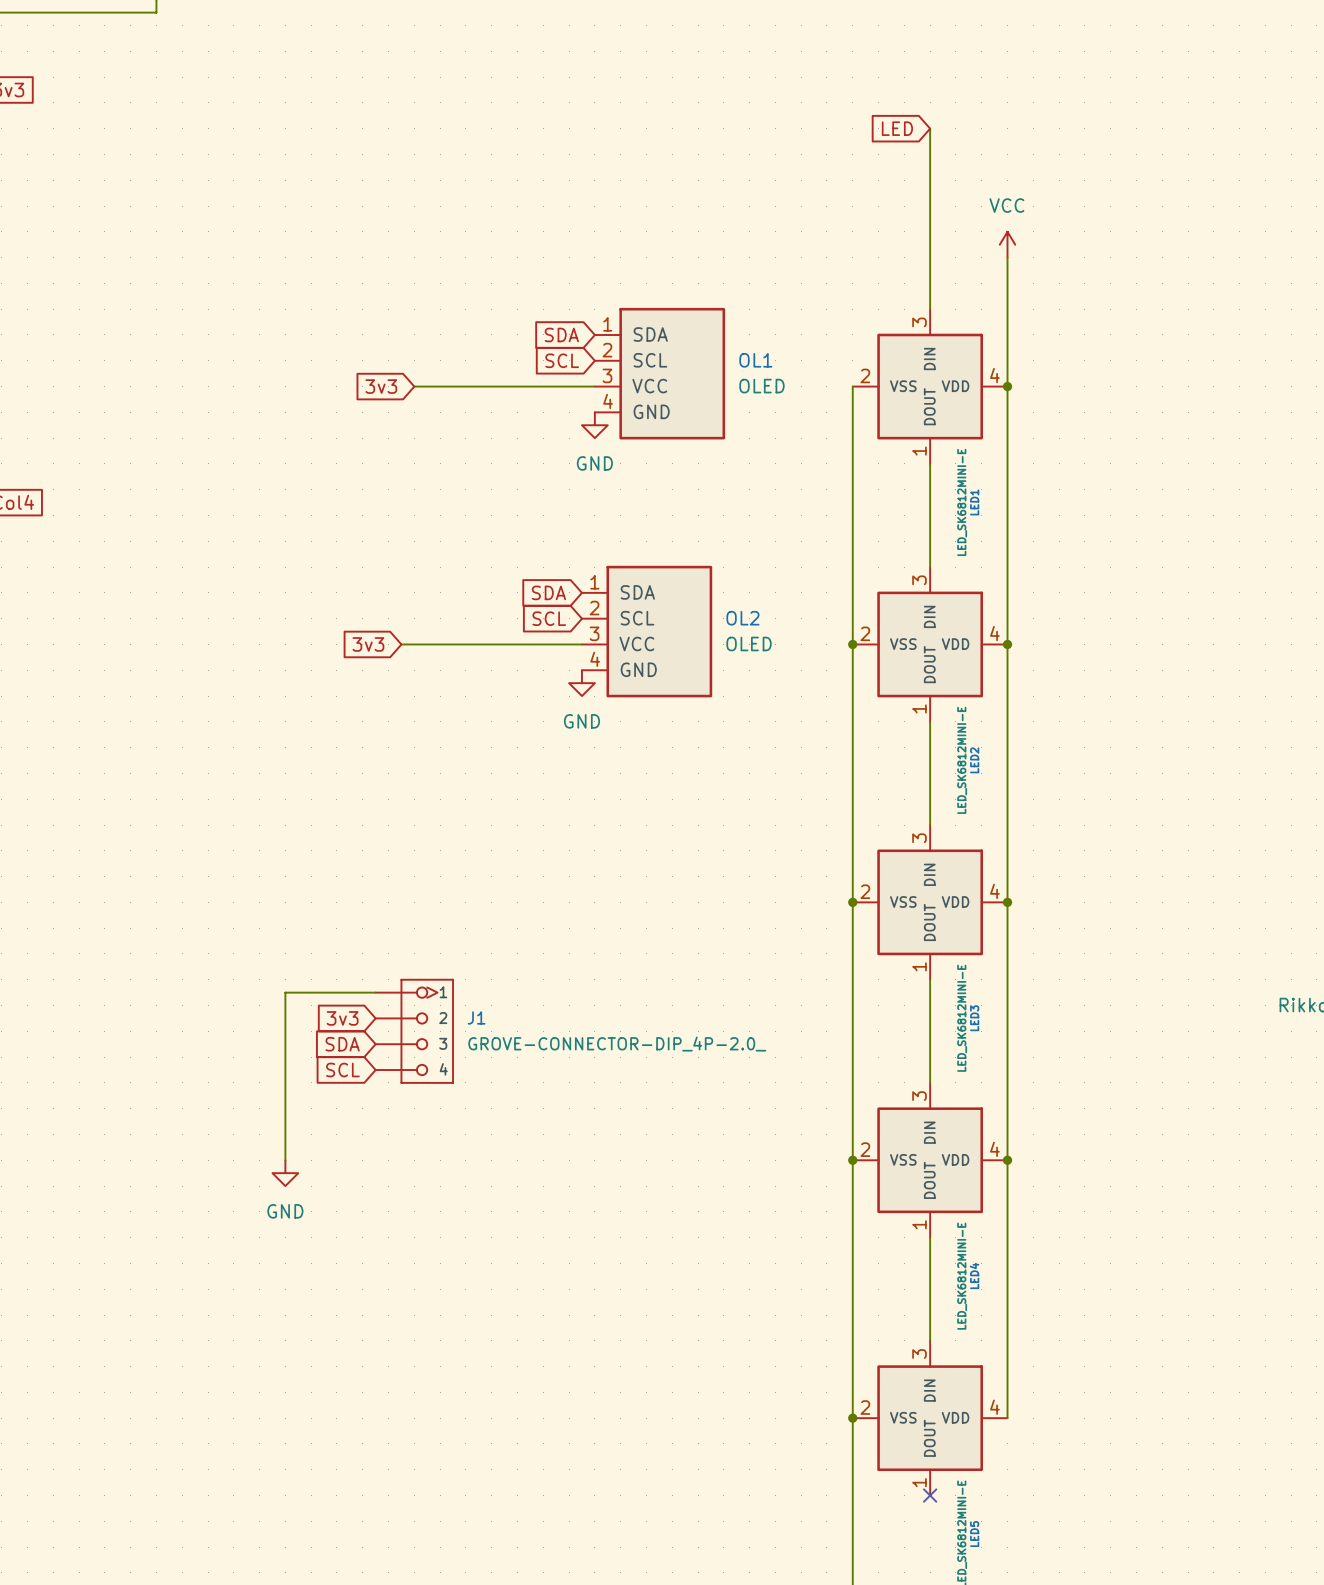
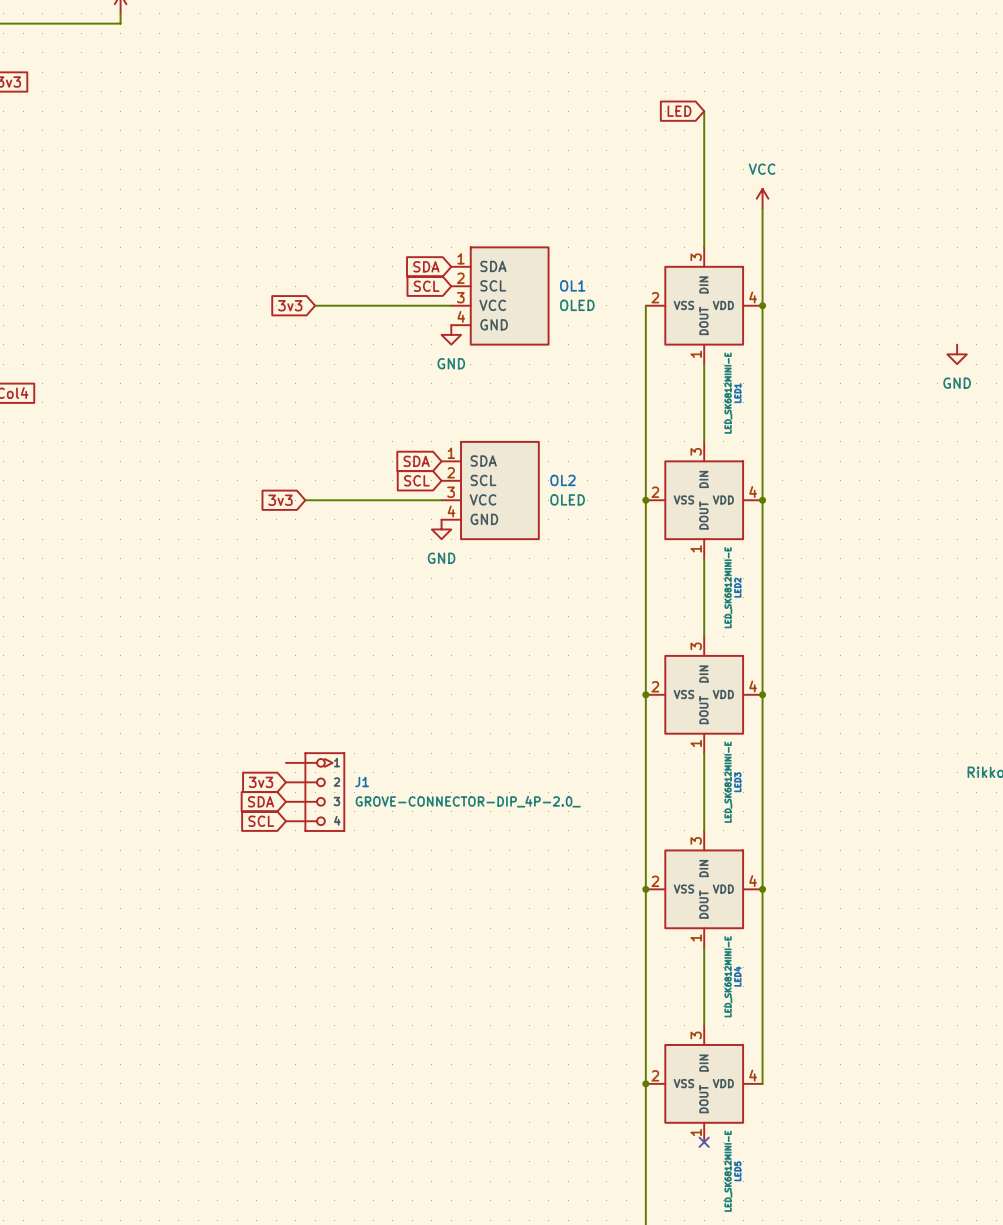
power symbol: none -> GND (957, 354)
wire: (375, 992) (285, 992) (285, 1160) -> none
power symbol: GND (285, 1173) -> none

